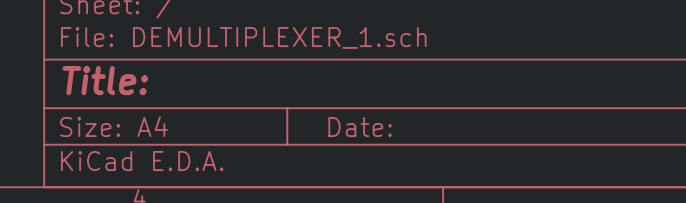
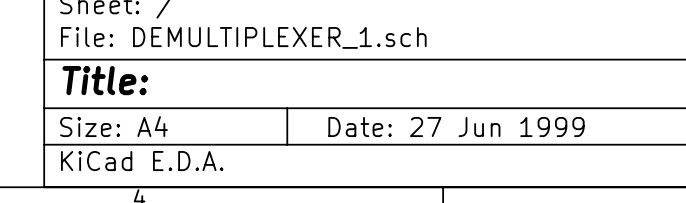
title block: Date: (360, 127) -> Date: 27 Jun 1999 (456, 127)

